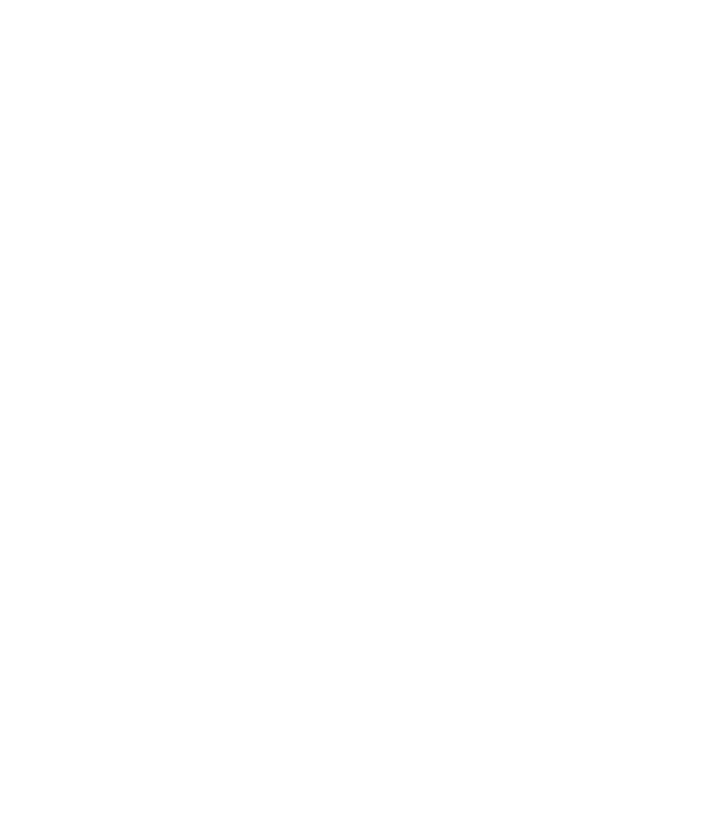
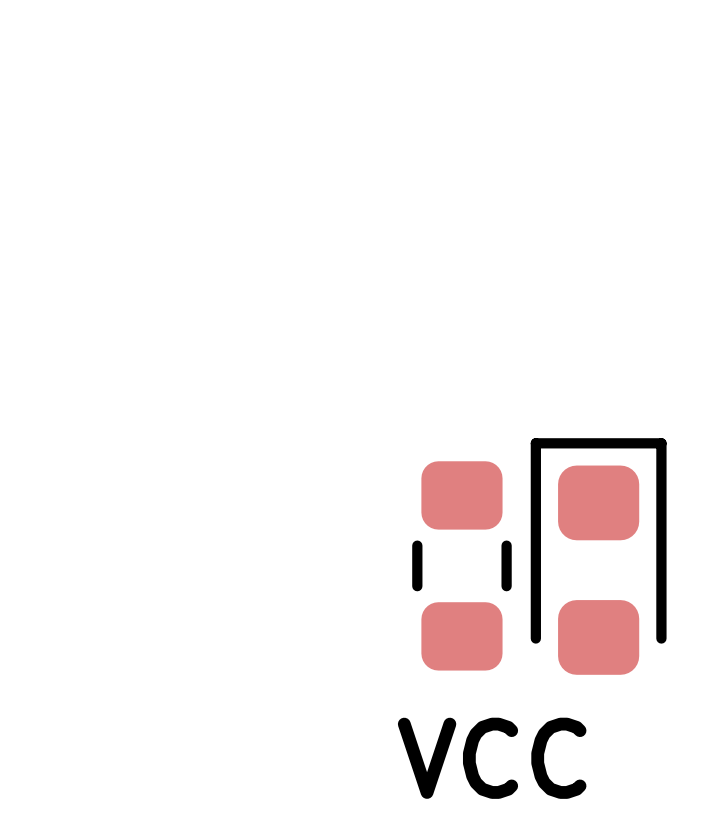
part: none -> (598, 556)
part: none -> (461, 565)
text: none -> VCC (492, 758)

